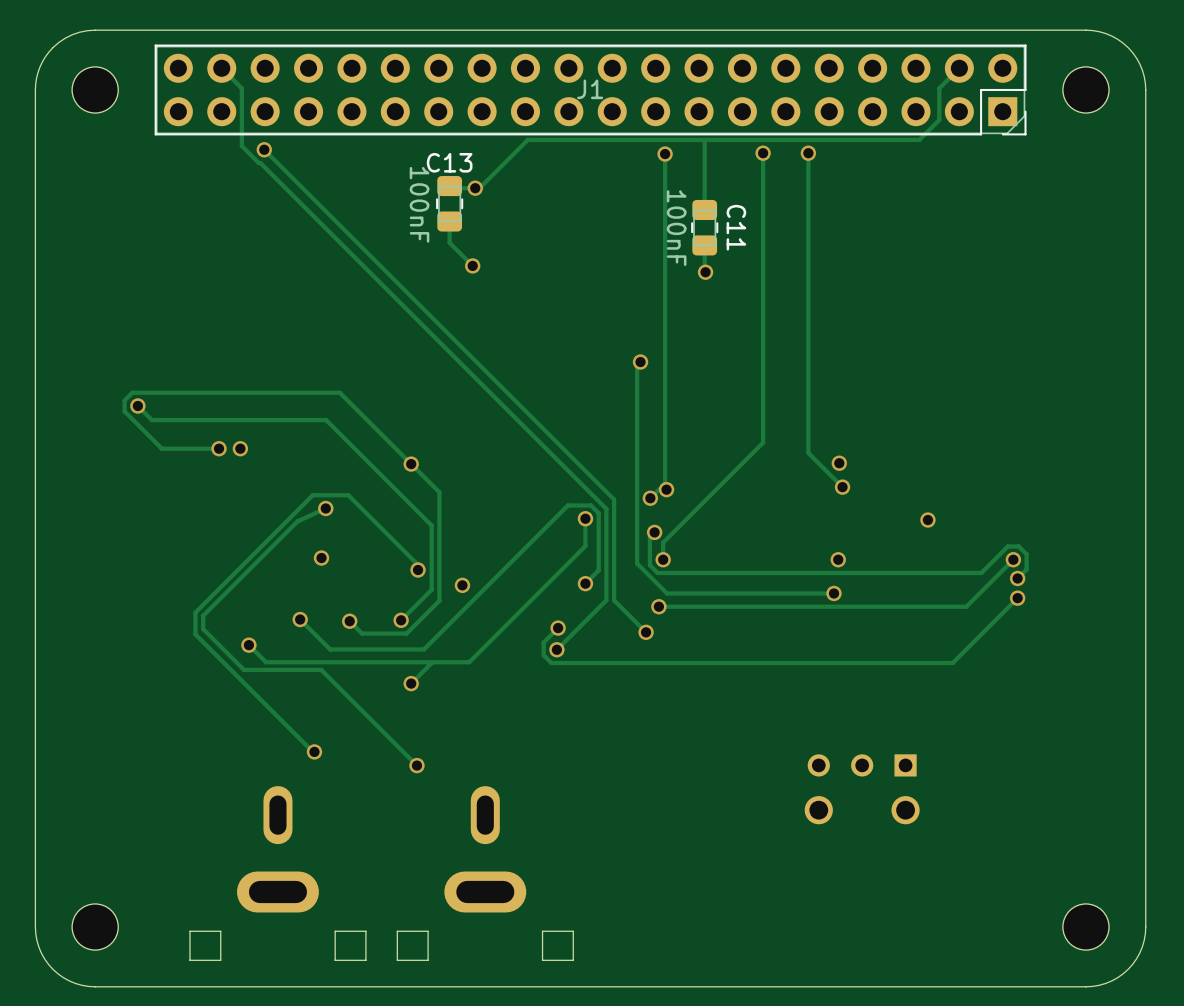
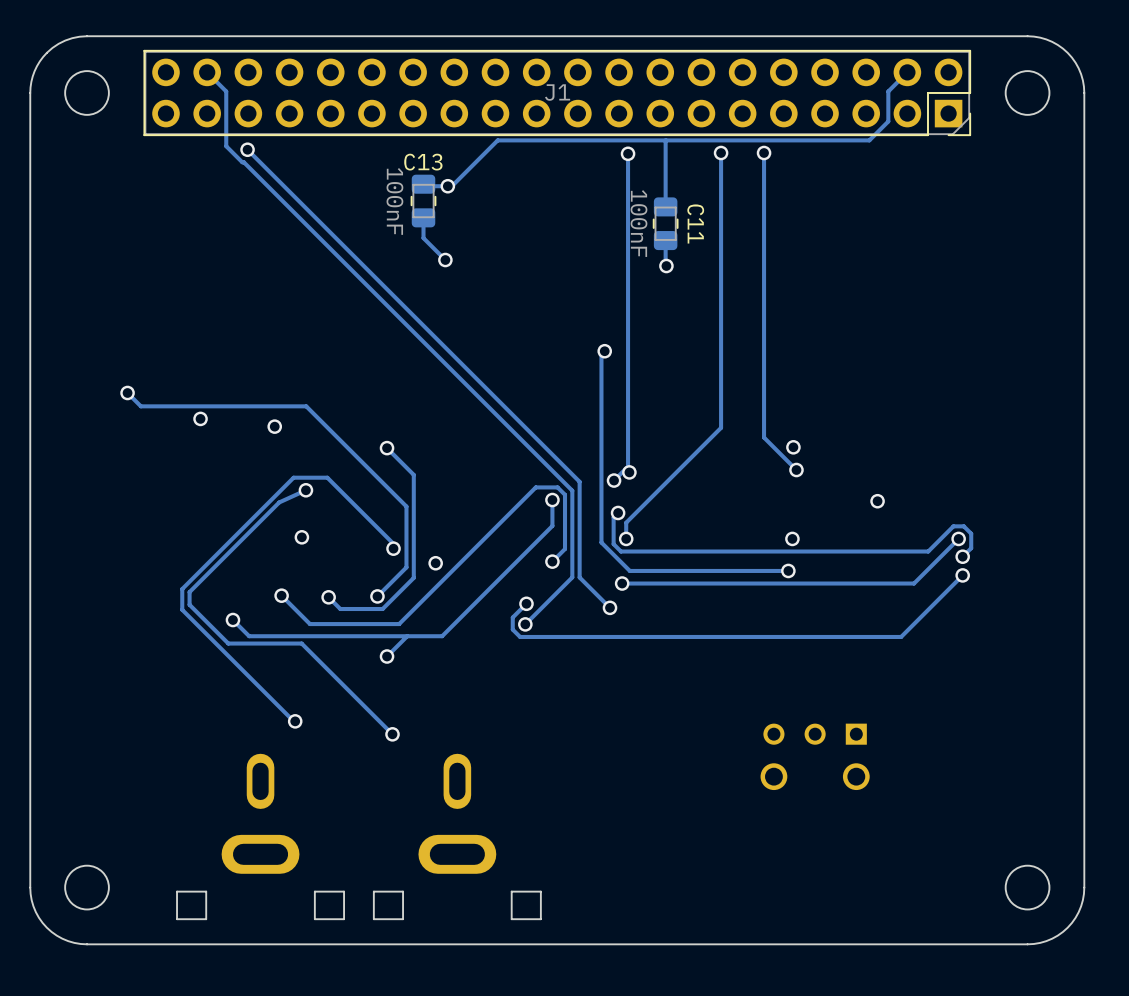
via: none -> (200, 418)
via: none -> (274, 426)
track: (219, 448) (161, 448) (124, 411) (124, 400) (132, 392) (339, 392) (411, 464) -> none
via: (219, 448) -> none
via: (240, 448) -> none

